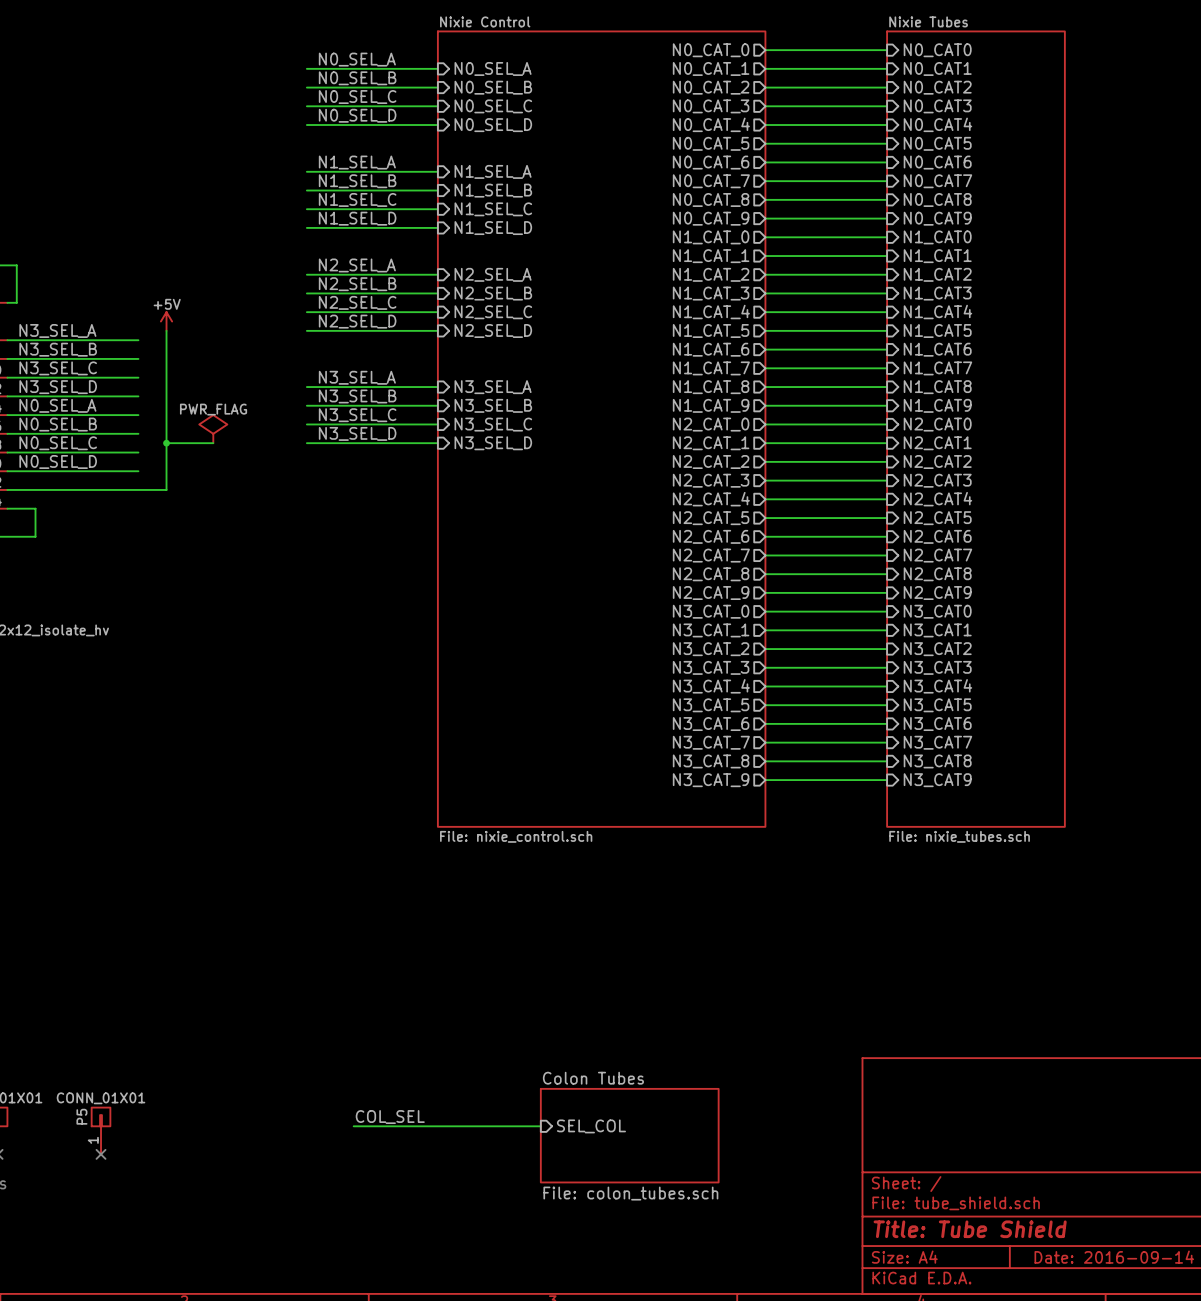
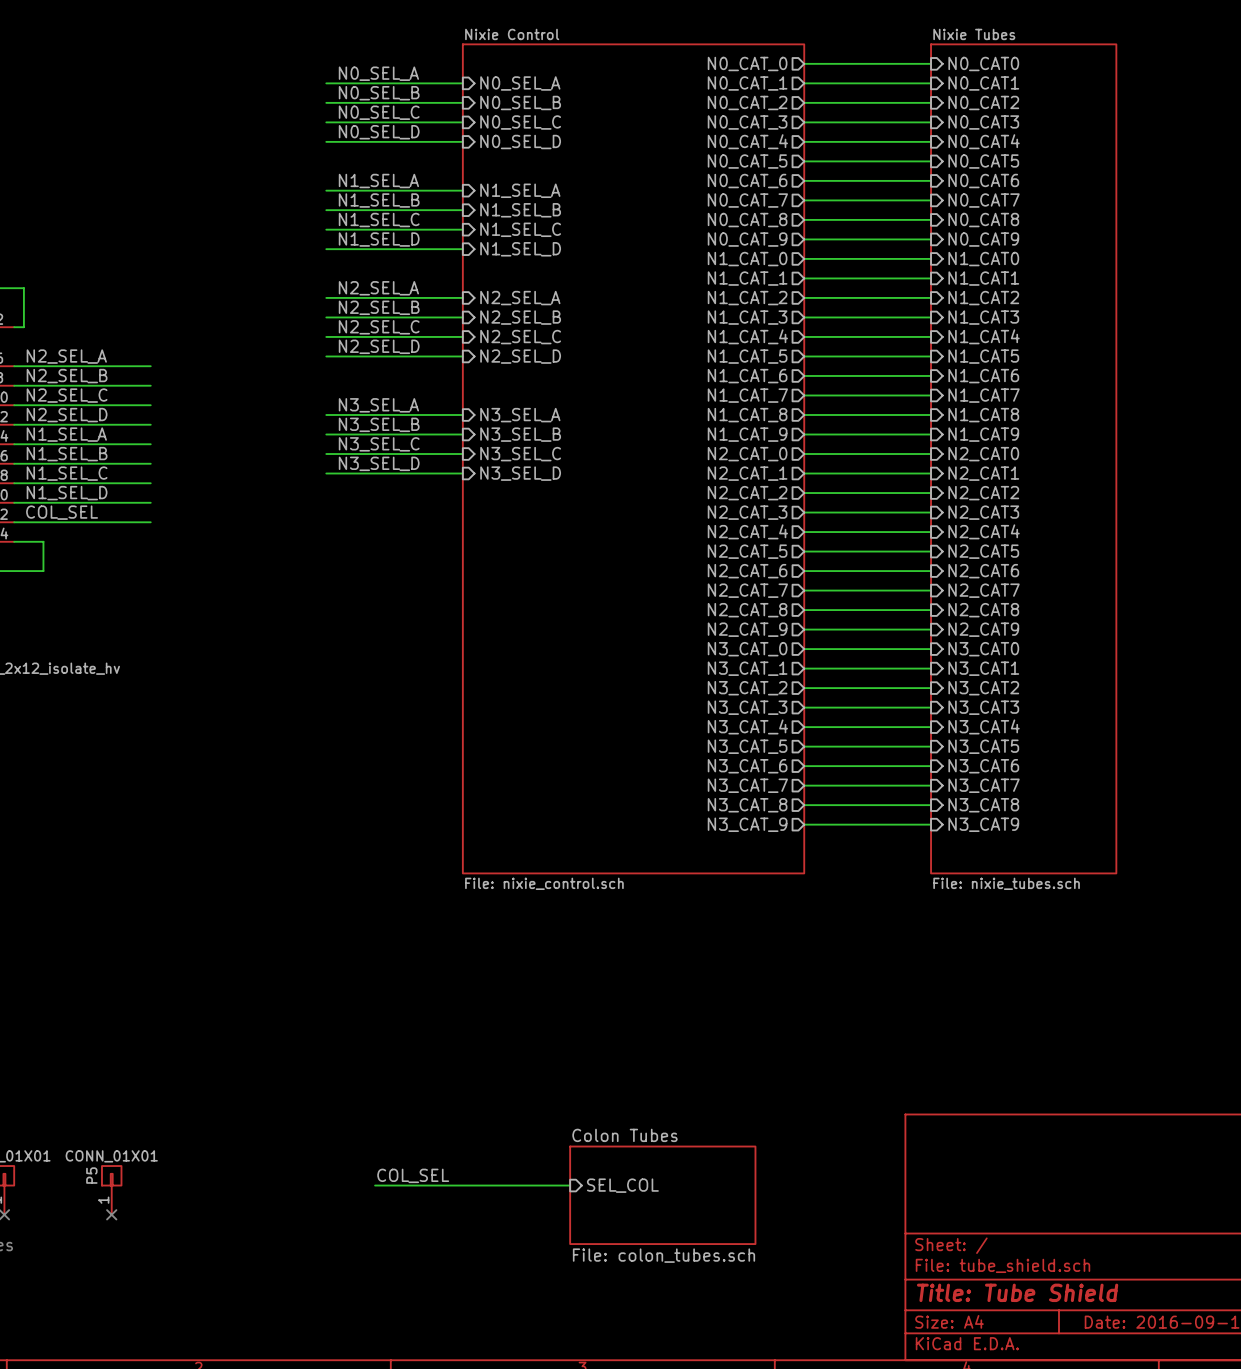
power symbol: +5V (166, 321) -> none
label: N3_SEL_A (57, 330) -> N2_SEL_A (66, 356)
wire: (166, 330) (166, 489) (138, 489) -> none
label: N3_SEL_B (58, 349) -> N2_SEL_B (67, 376)
label: N3_SEL_C (58, 368) -> N2_SEL_C (67, 395)
label: N3_SEL_D (58, 387) -> N2_SEL_D (67, 415)
label: N0_SEL_A (57, 405) -> N1_SEL_A (66, 434)
label: N0_SEL_B (58, 424) -> N1_SEL_B (67, 454)
power symbol: PWR_FLAG (213, 429) -> none
label: N0_SEL_C (58, 443) -> N1_SEL_C (67, 473)
wire: (166, 443) (213, 443) -> none
junction: (166, 443) -> none
label: N0_SEL_D (58, 461) -> N1_SEL_D (67, 493)
label: none -> COL_SEL (62, 512)

